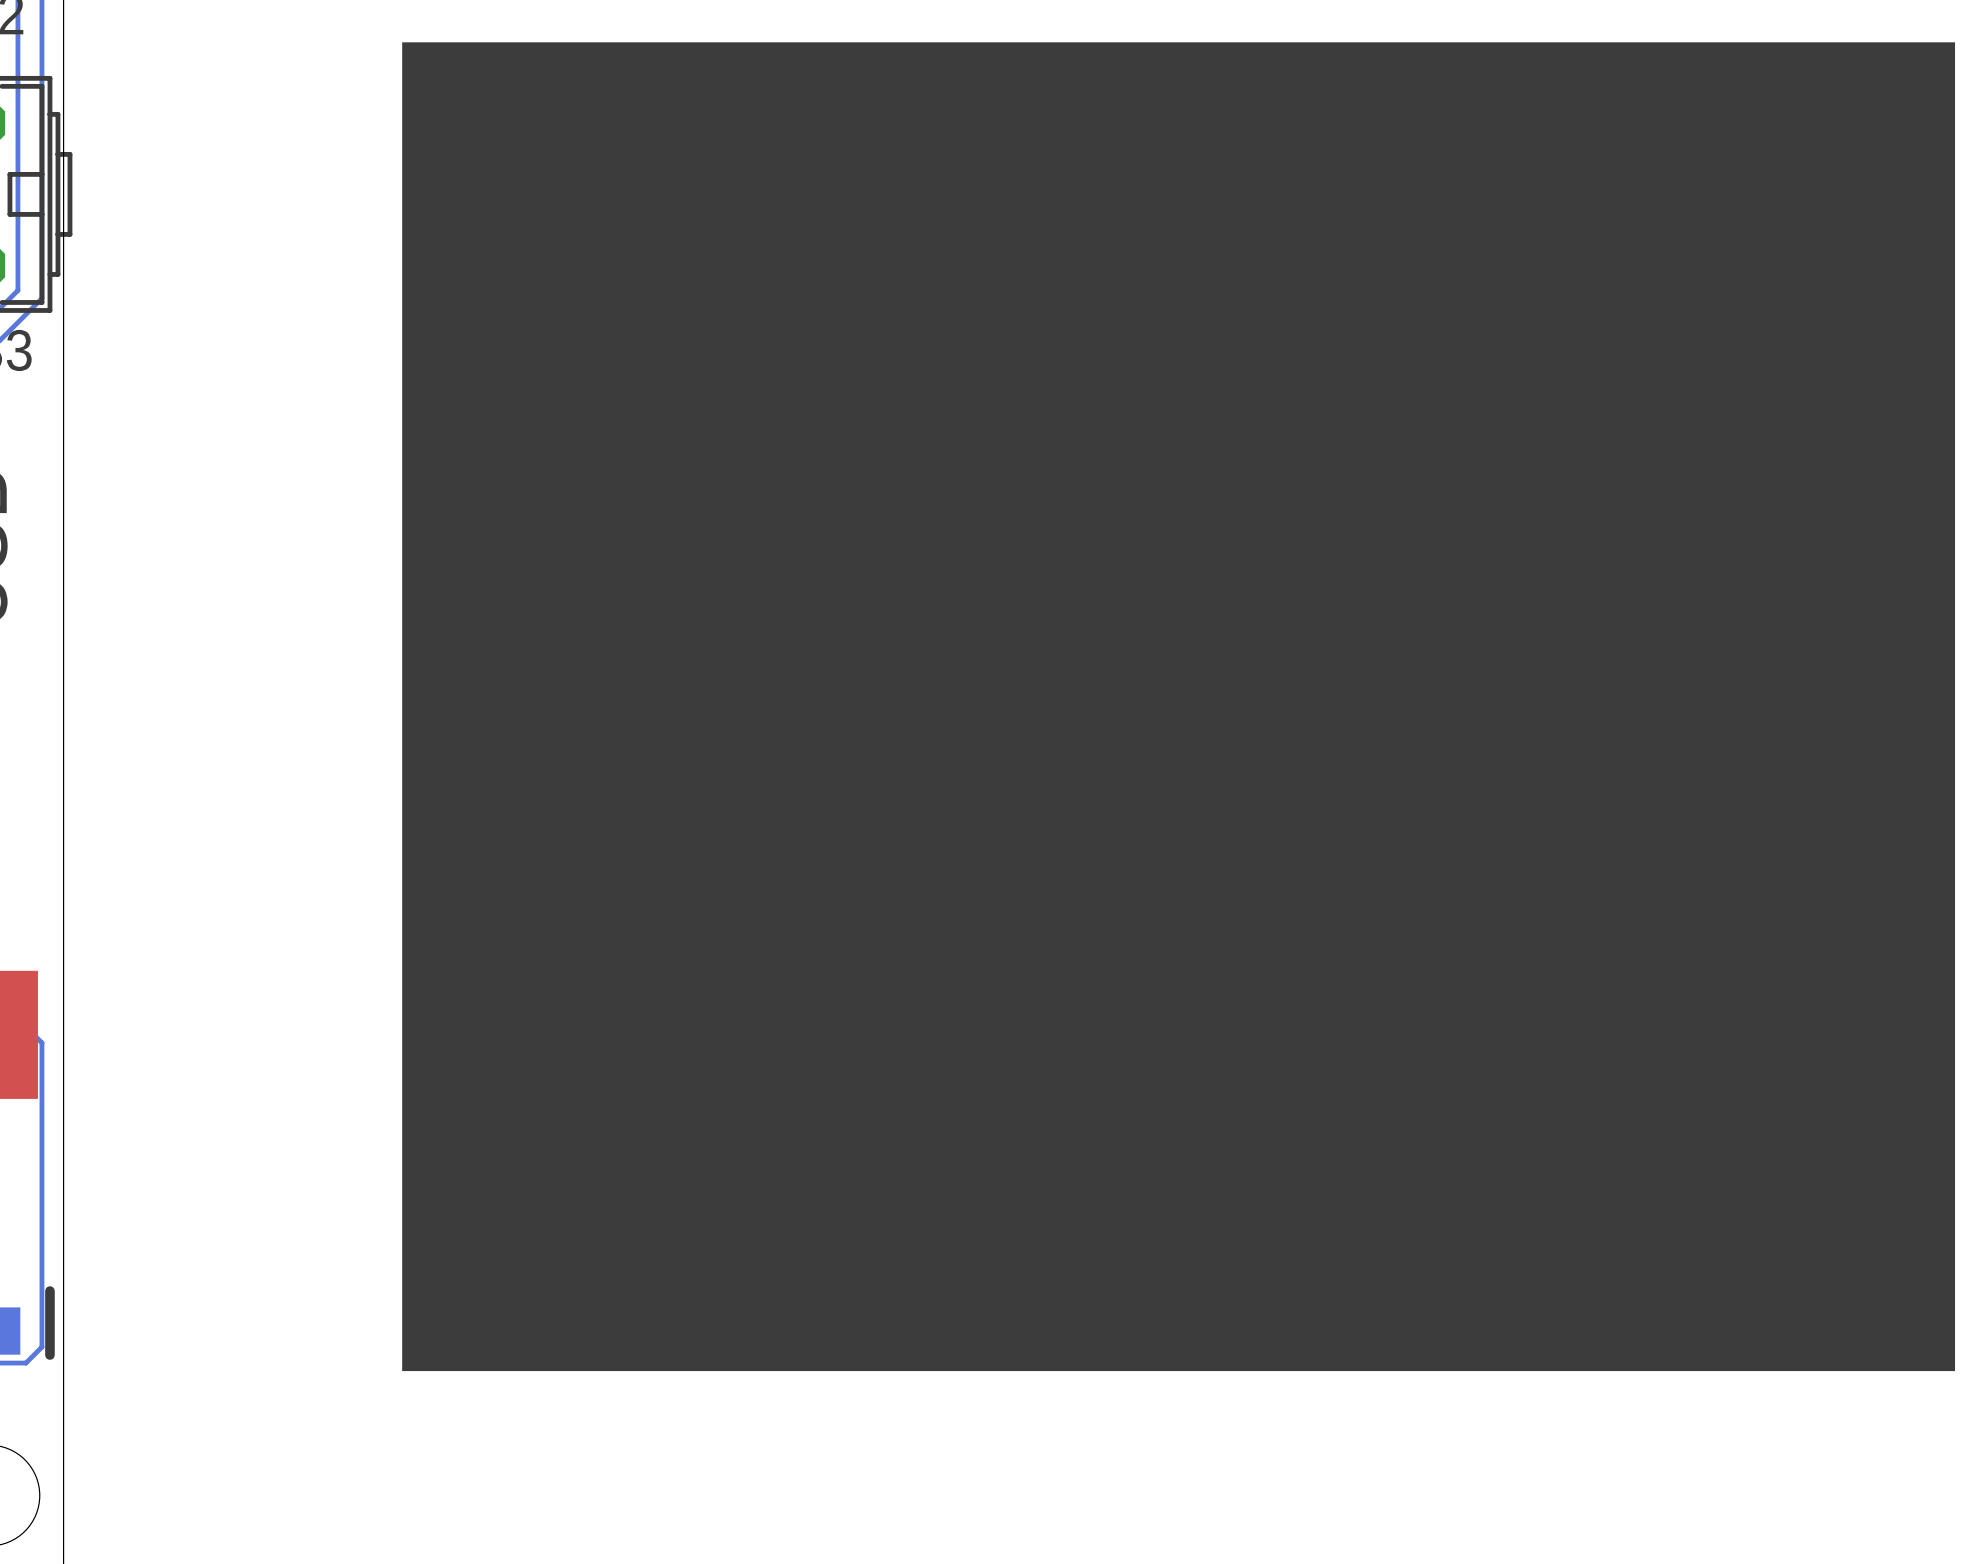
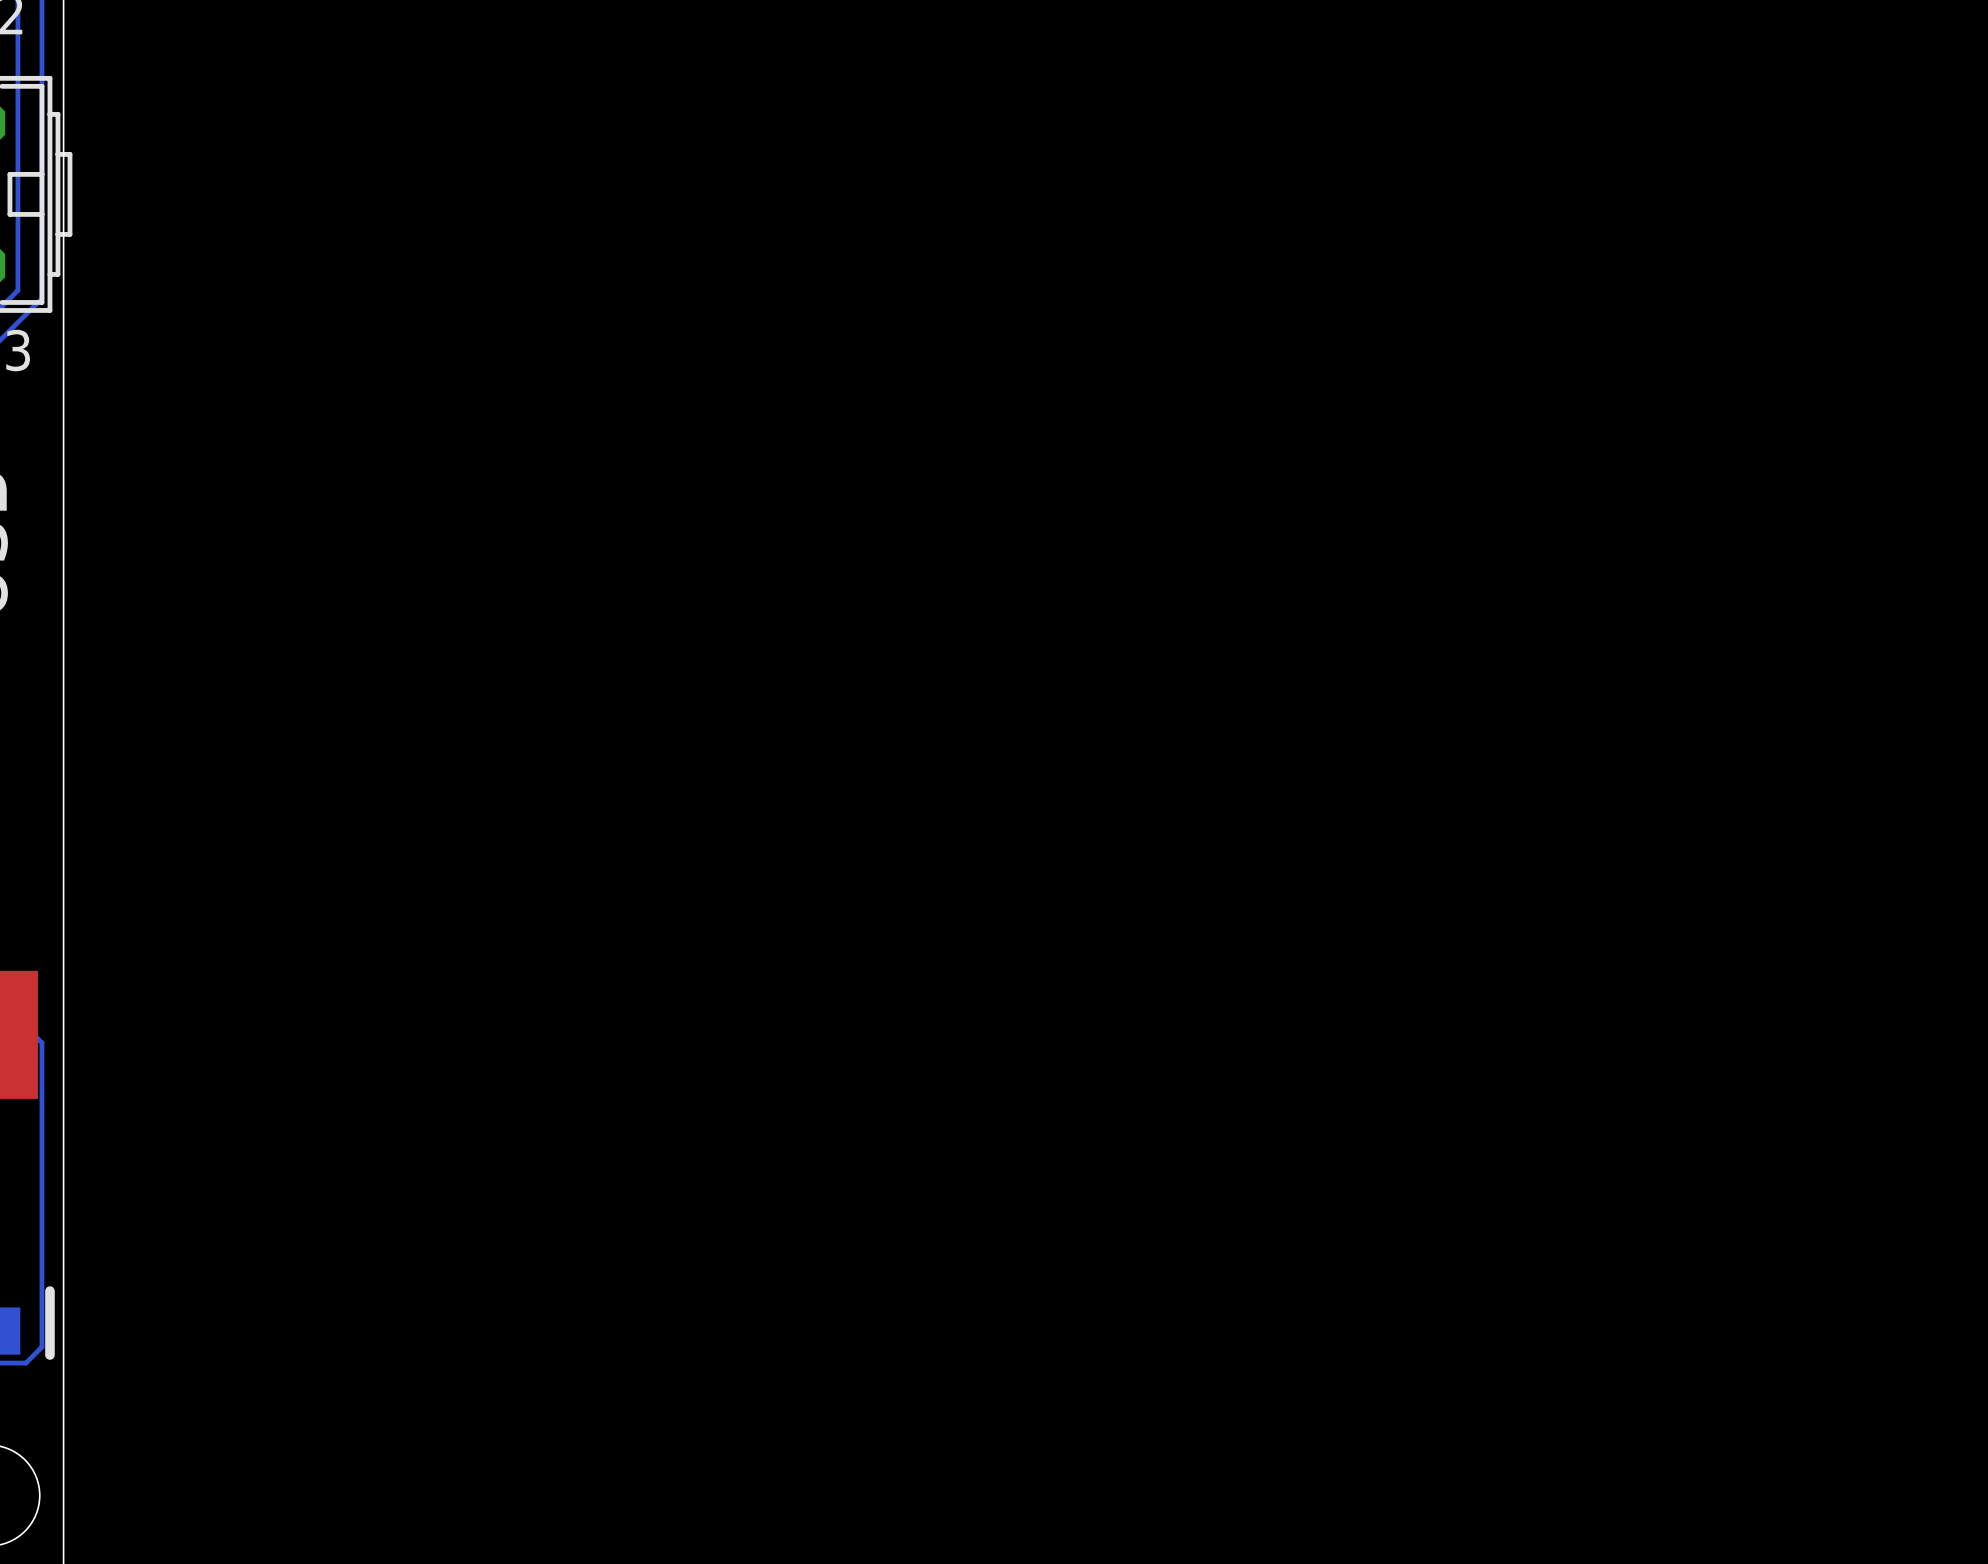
drawing: [402, 42, 1956, 1372] -> none

